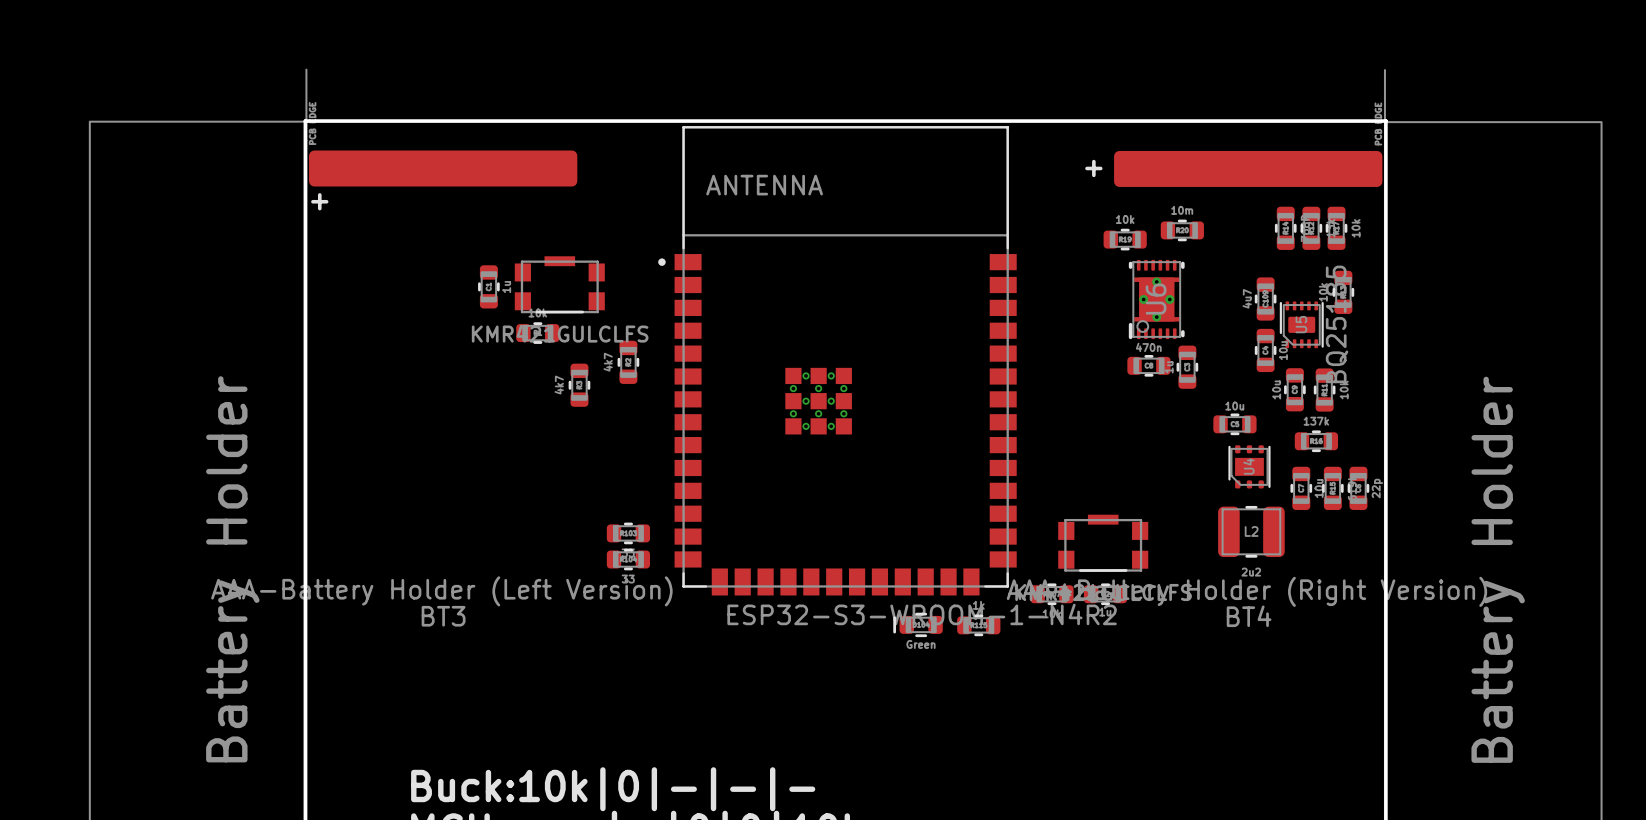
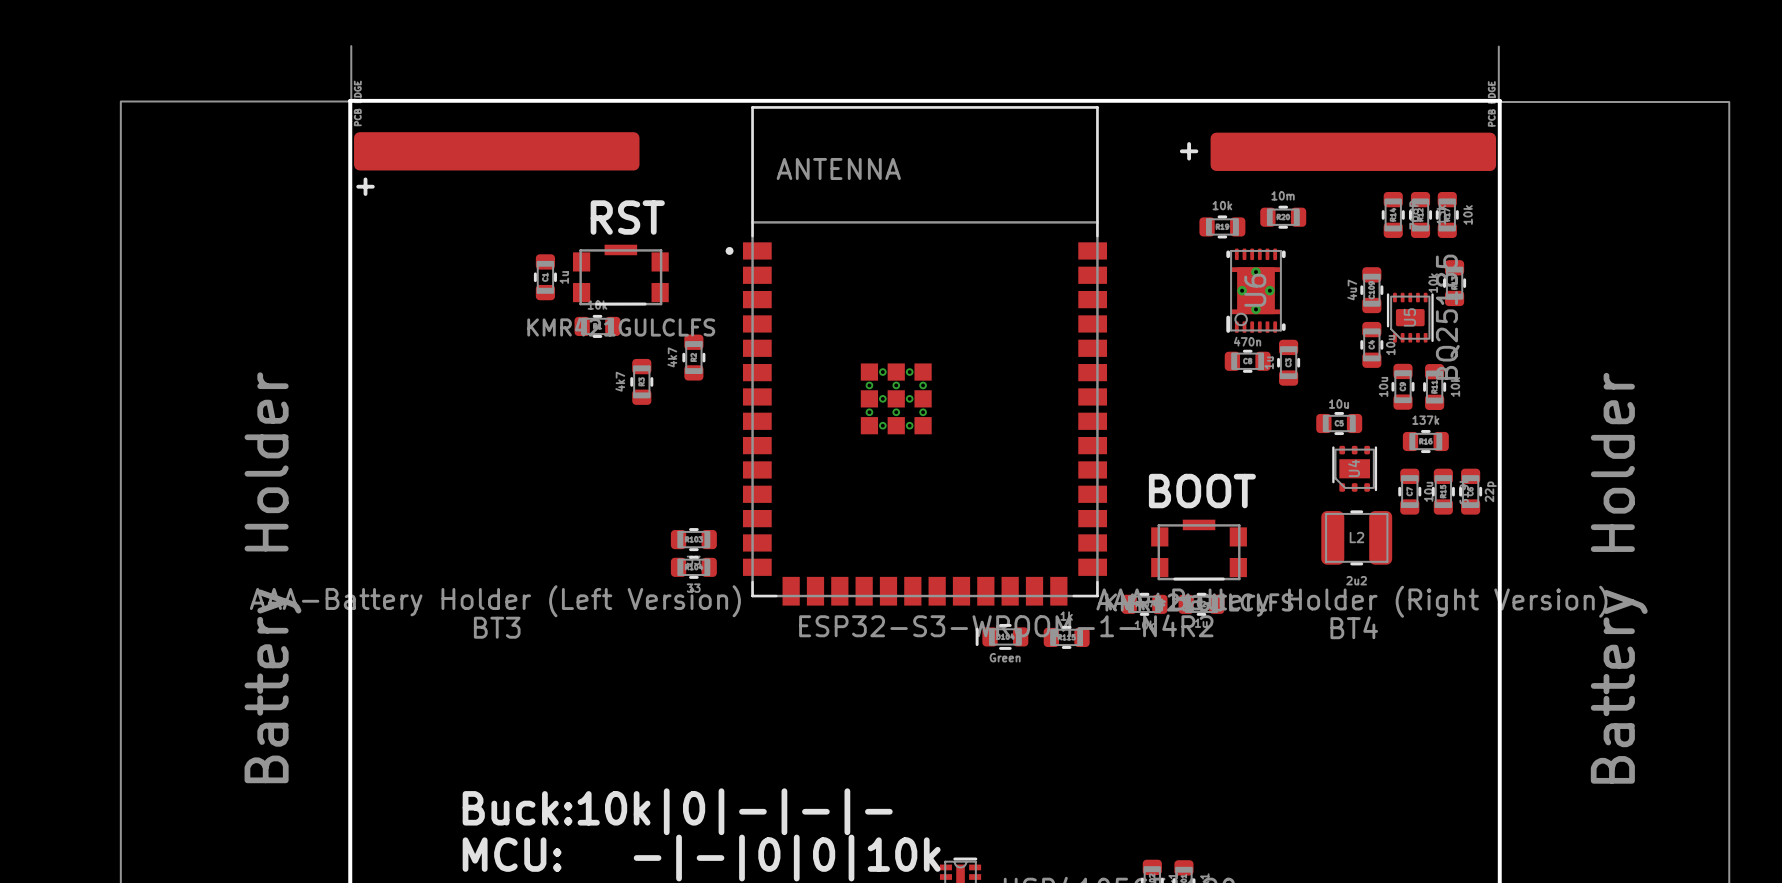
text: none -> RST (627, 217)
text: none -> BOOT (1202, 491)

